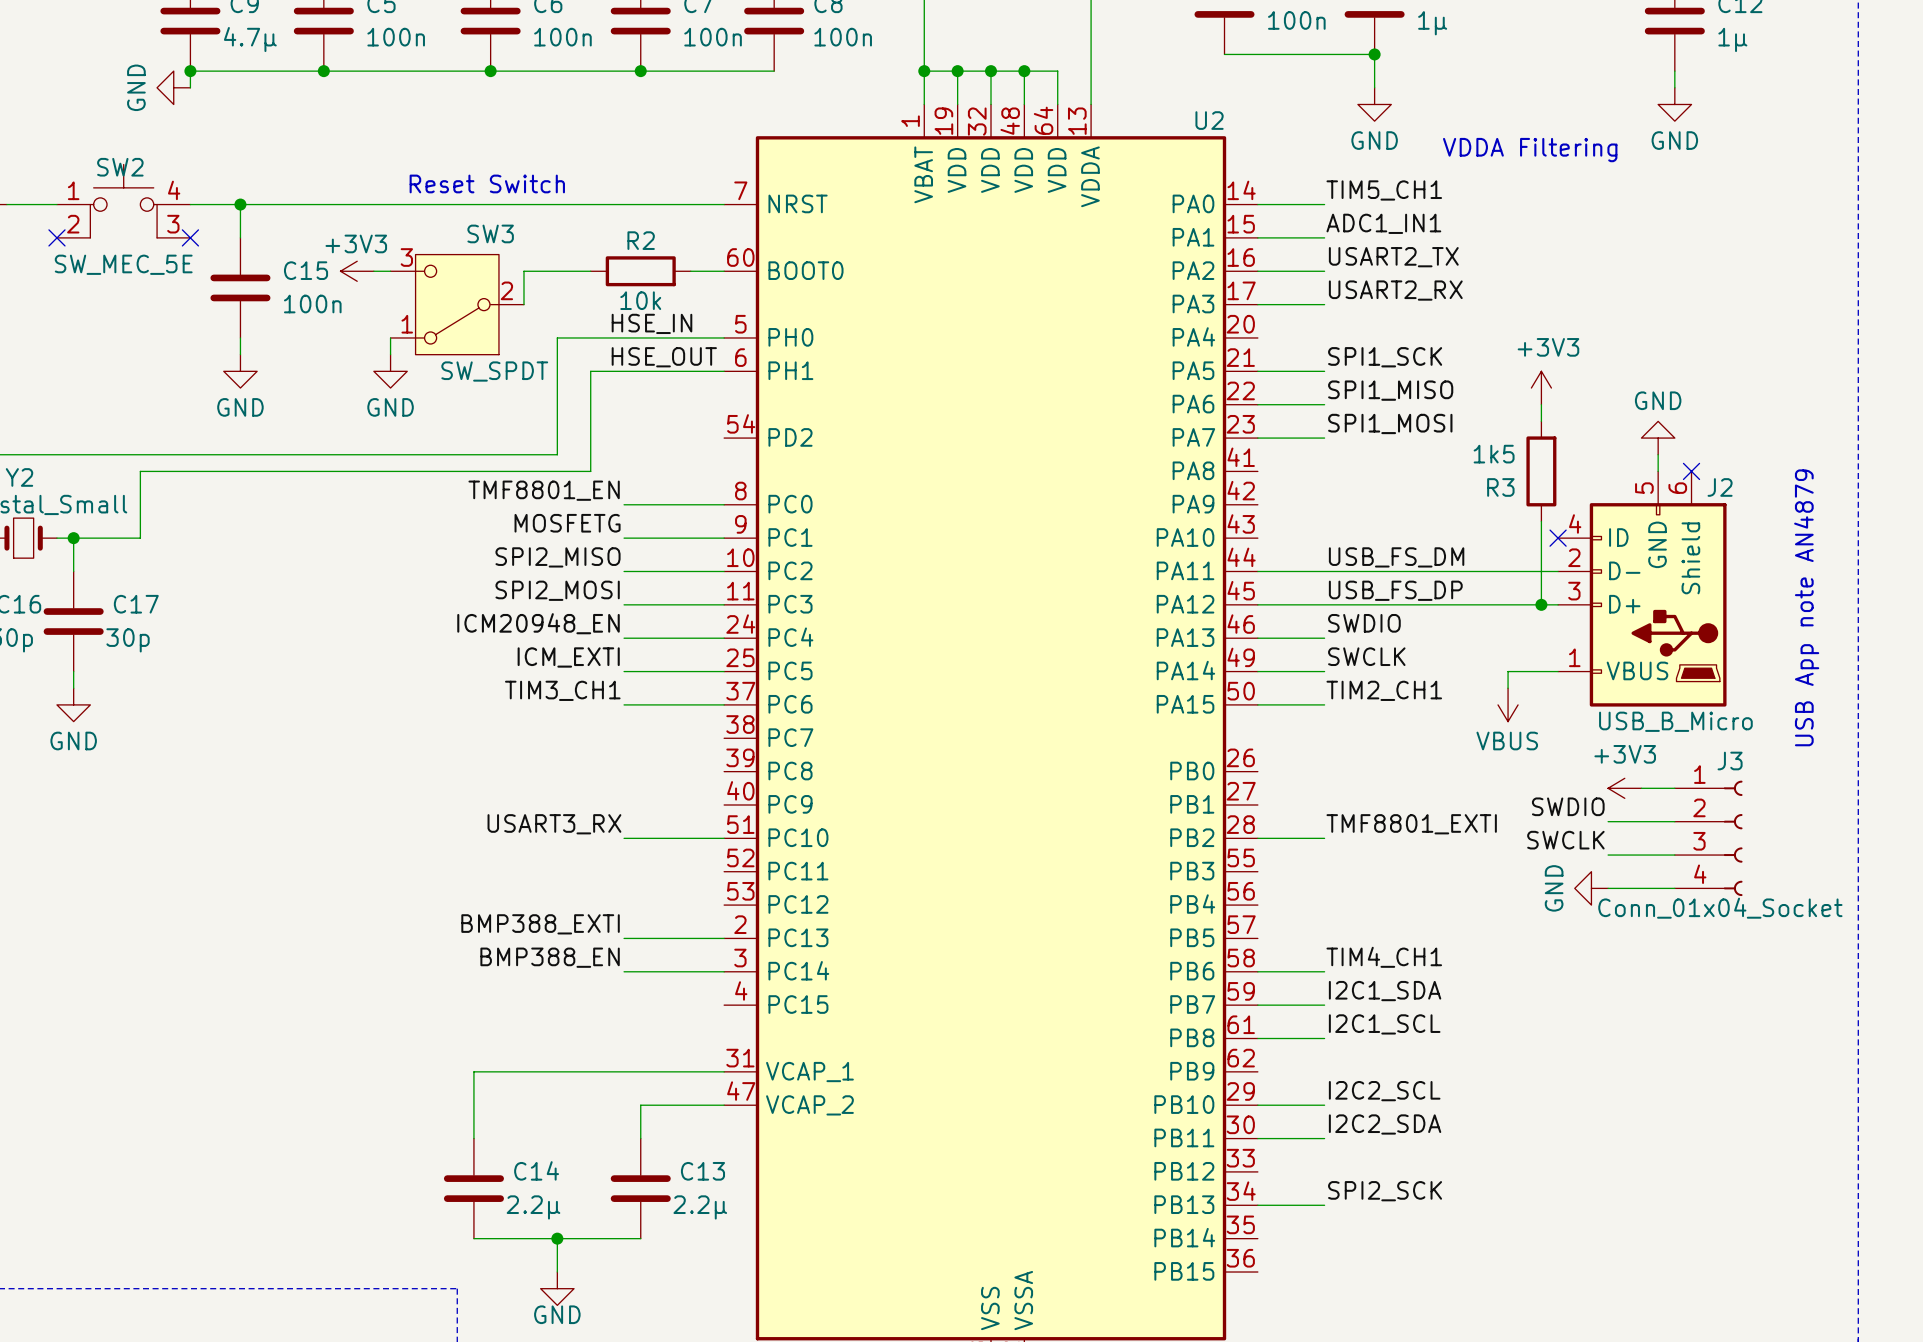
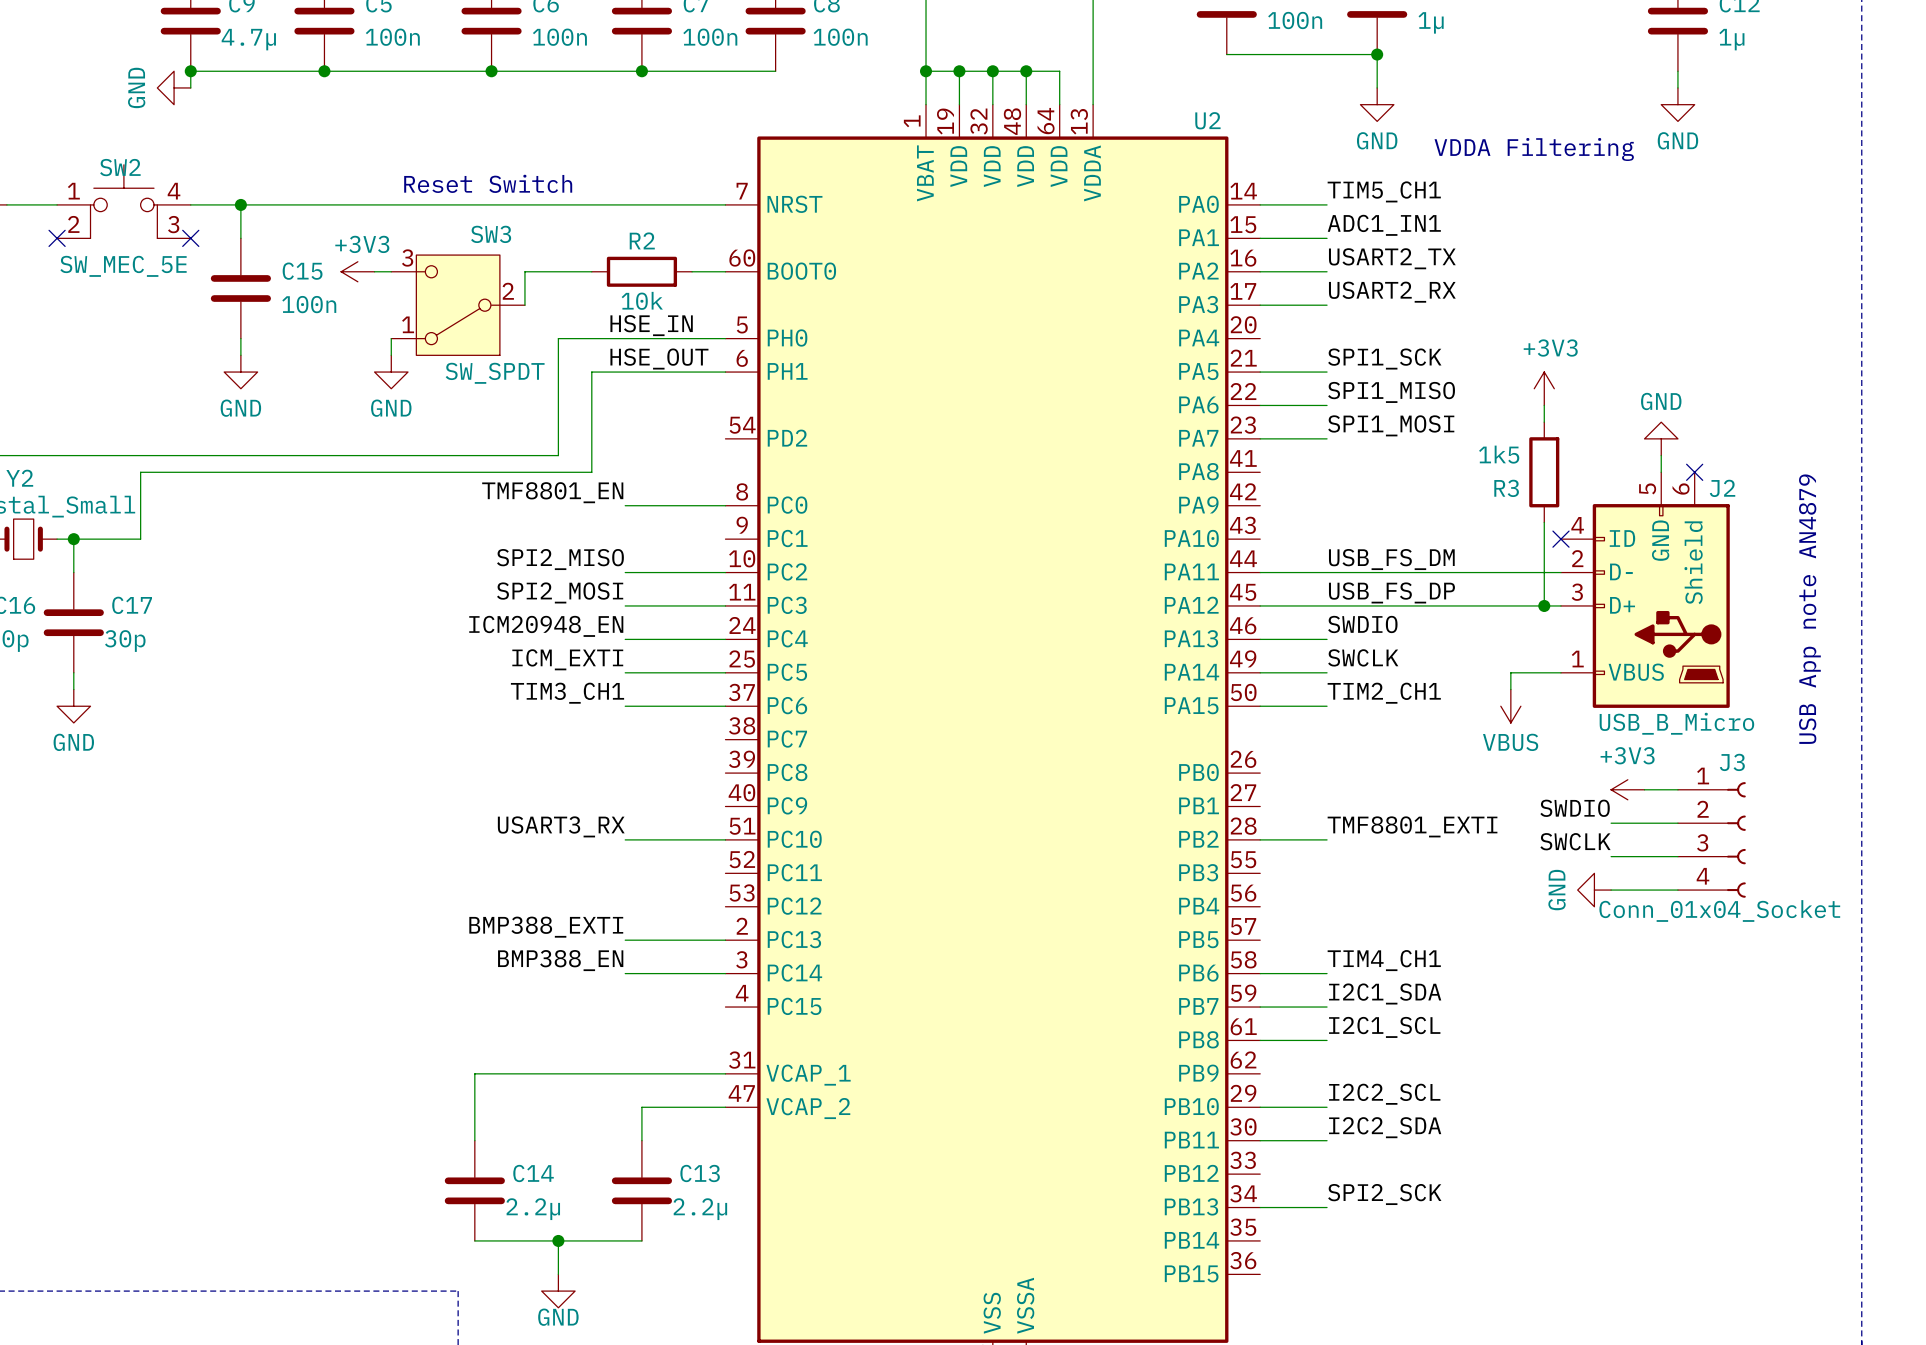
label: MOSFETG (567, 523) -> none
wire: (624, 538) (724, 538) -> none

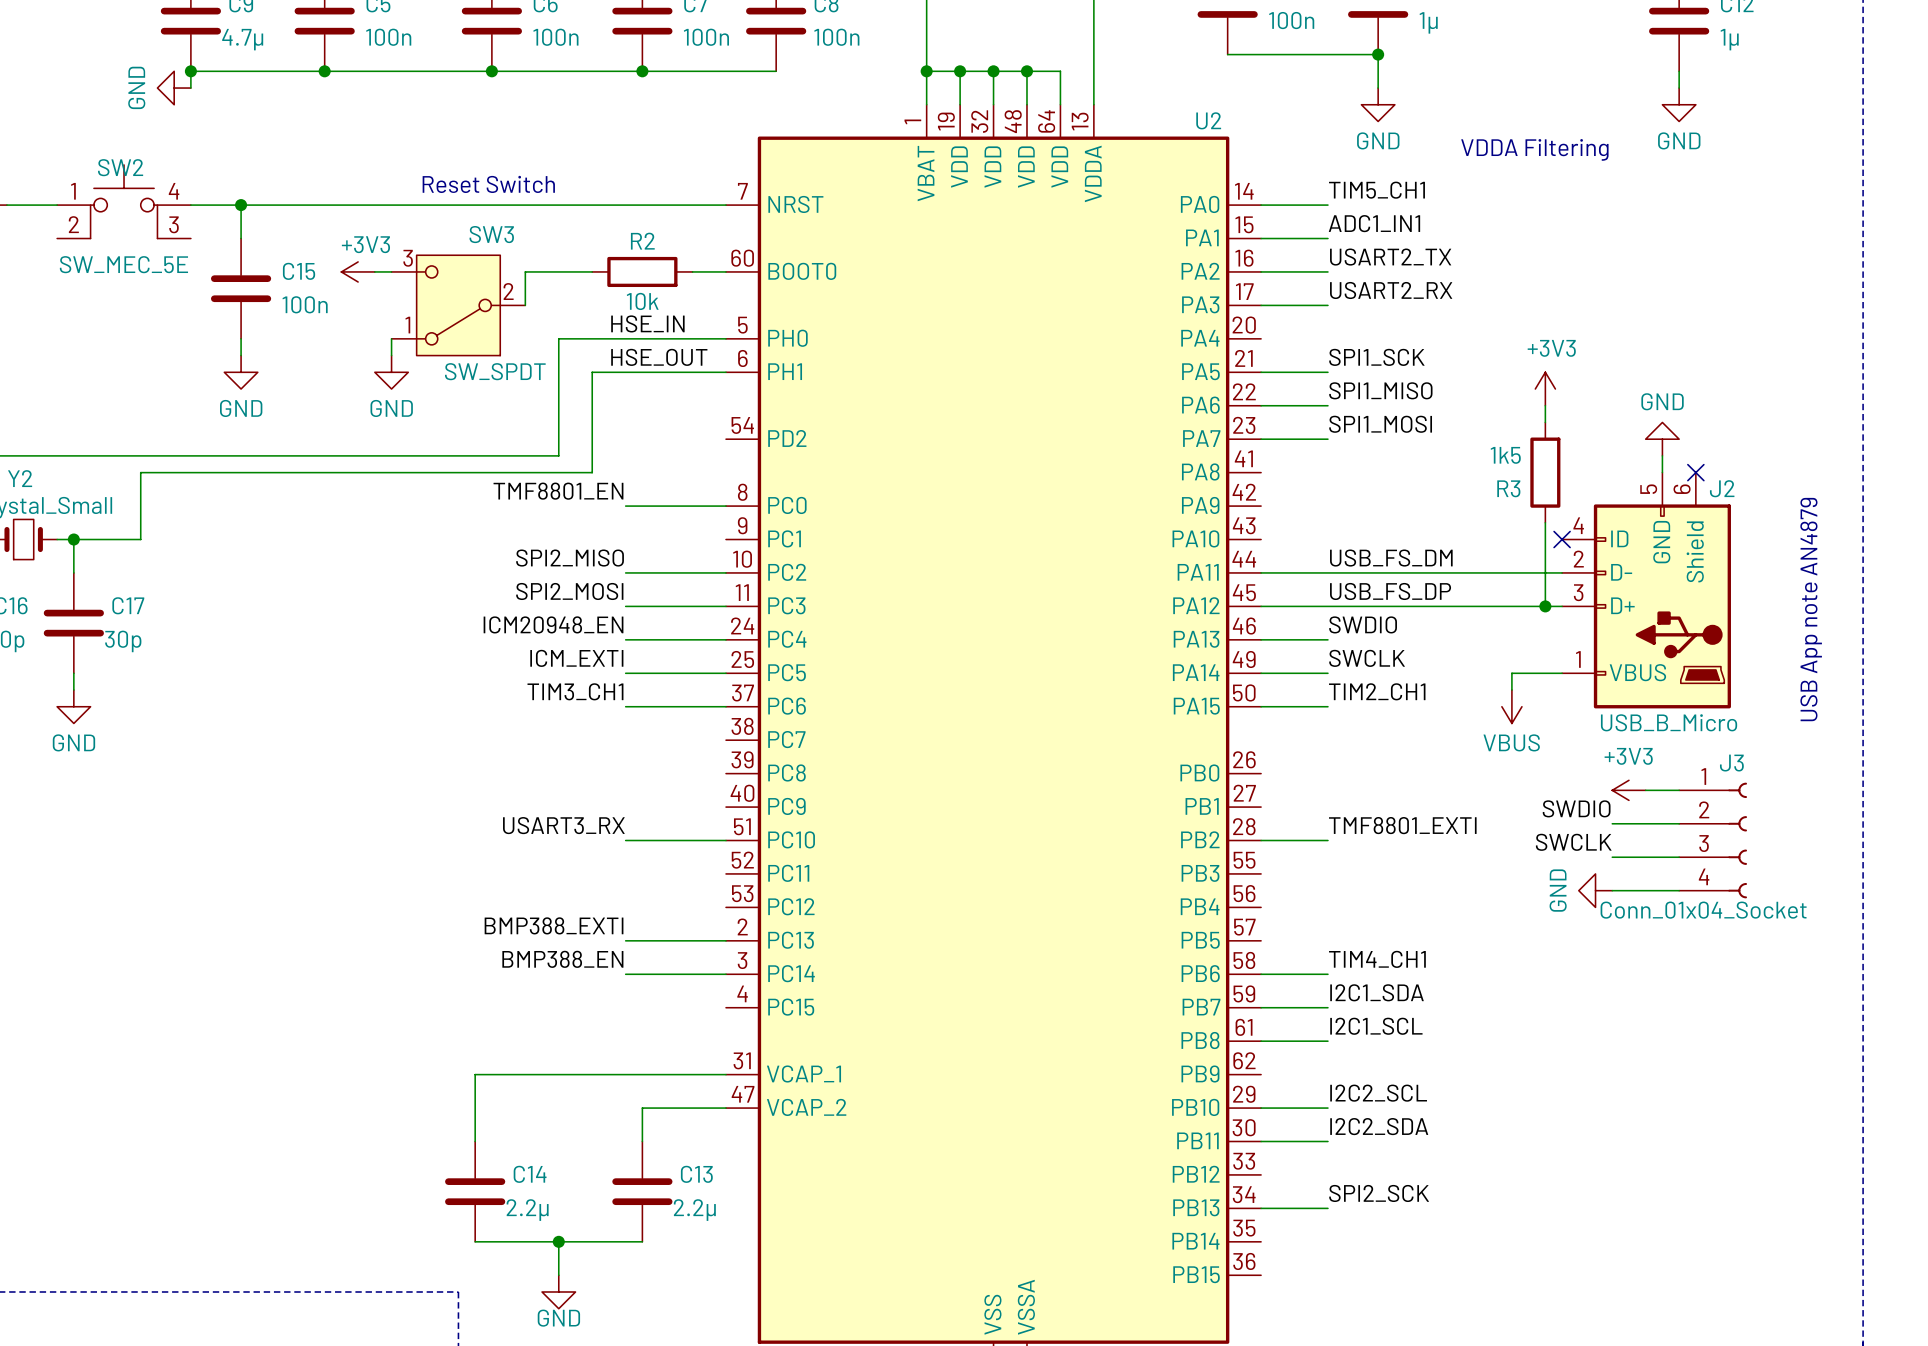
no-connect mark: (57, 238) -> none
no-connect mark: (190, 238) -> none

